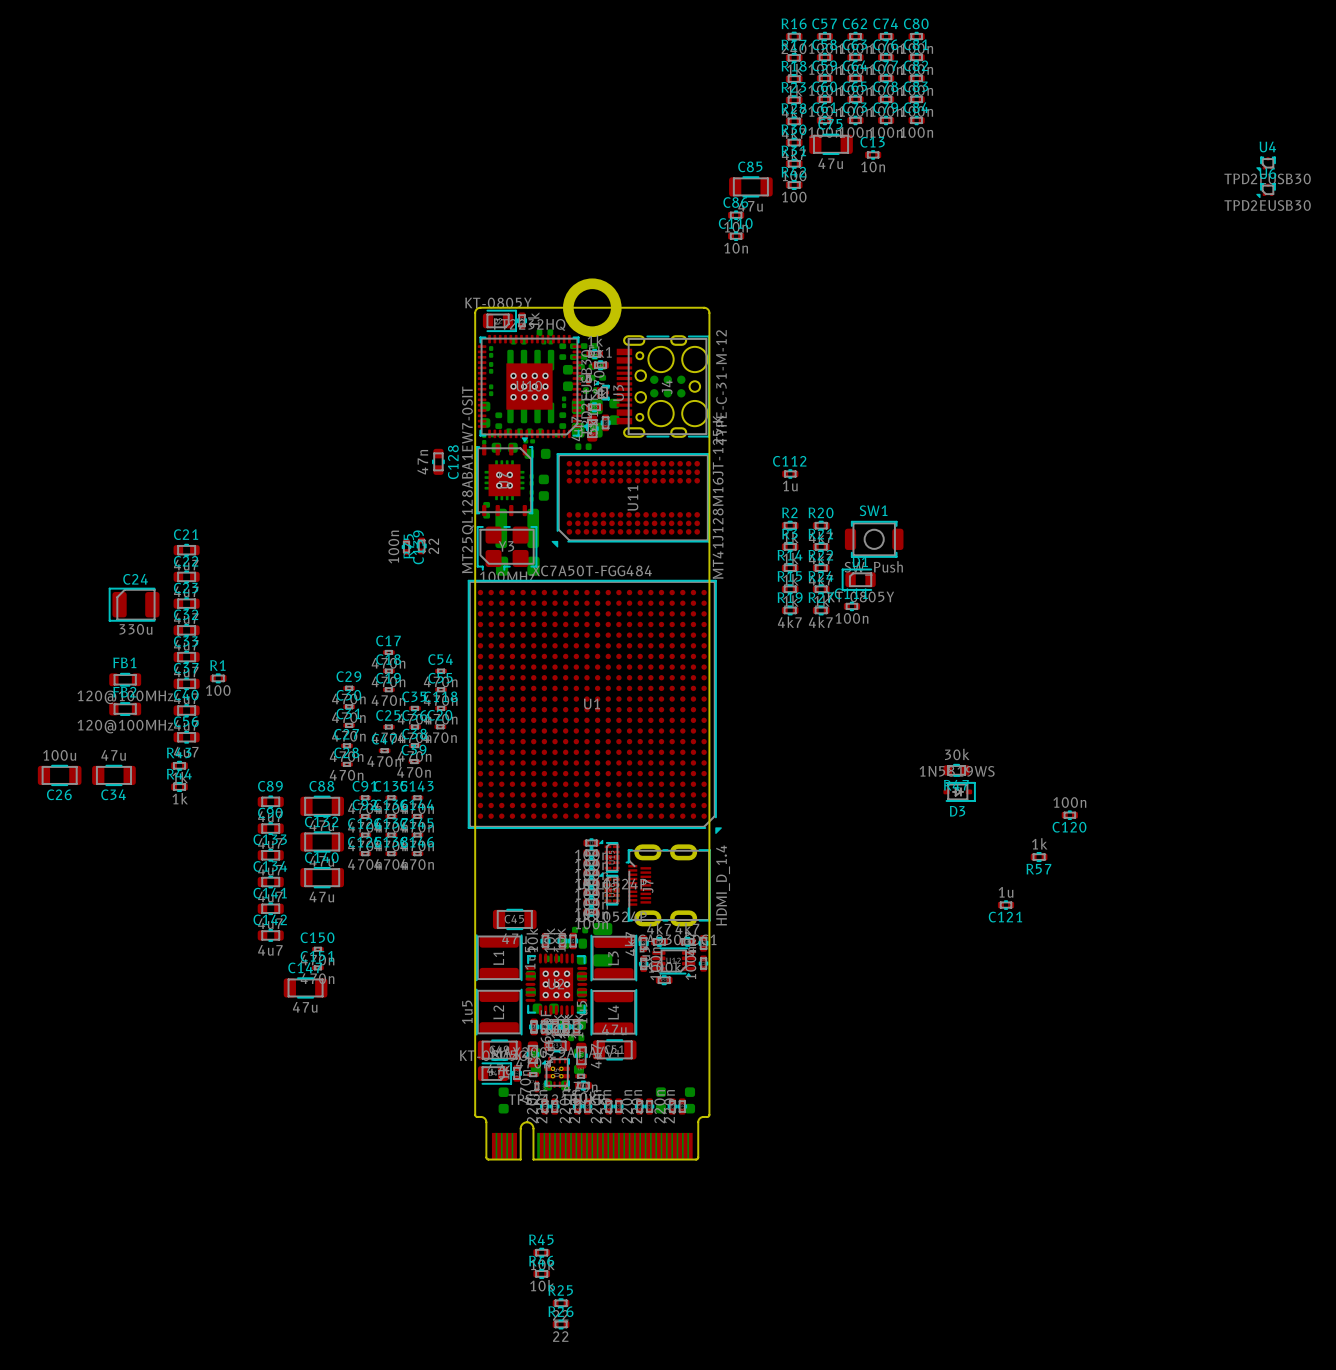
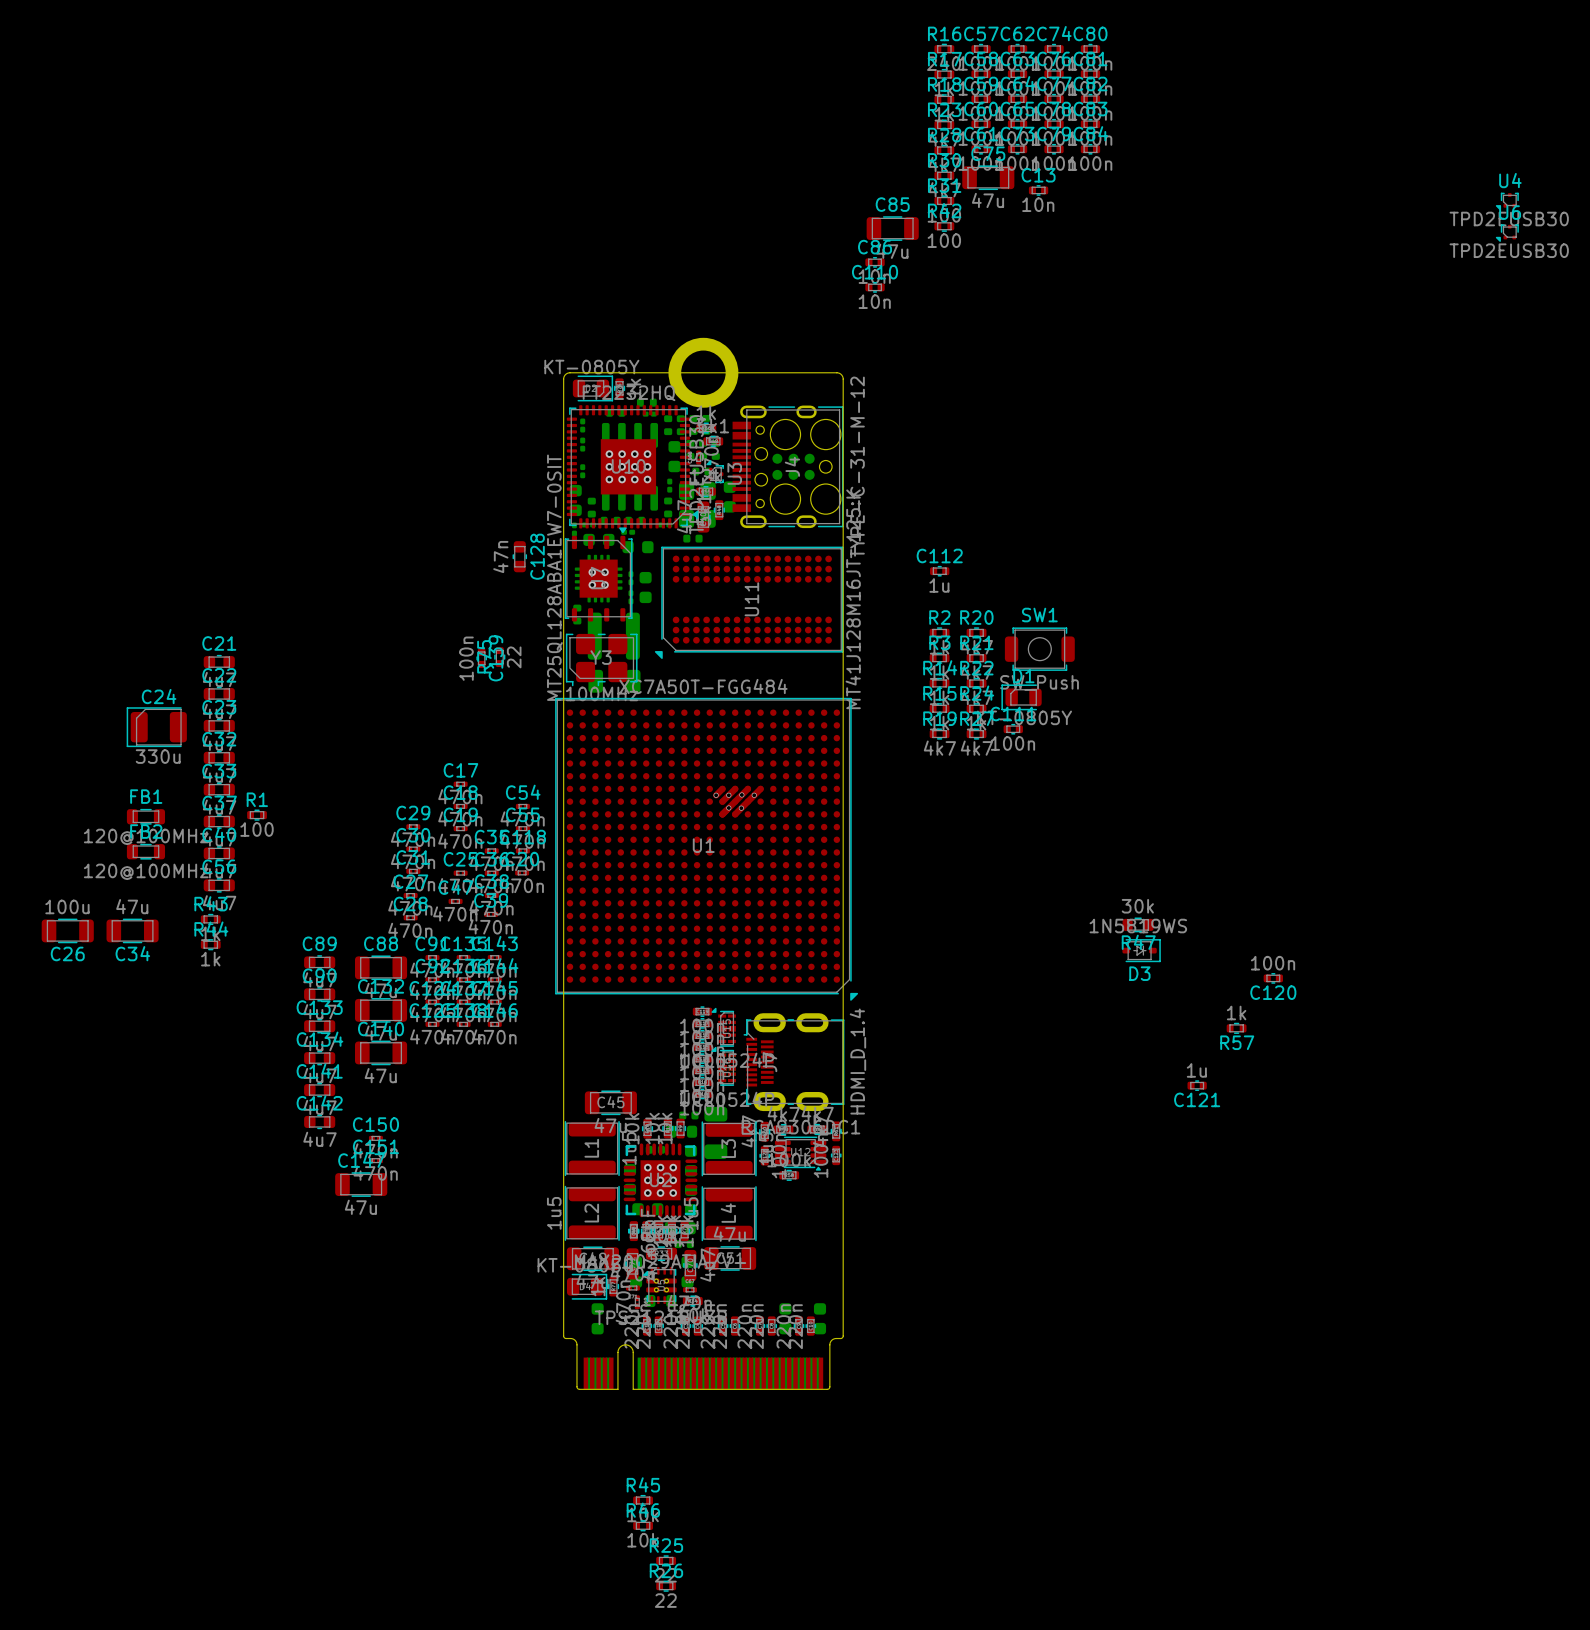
top track: none -> (722, 788) (716, 795)
top track: none -> (735, 788) (722, 801)
top track: none -> (747, 788) (722, 814)
top track: none -> (760, 788) (735, 814)
via: none -> (716, 795)
via: none -> (728, 795)
via: none -> (741, 794)
via: none -> (754, 795)
via: none -> (728, 808)
via: none -> (741, 808)

